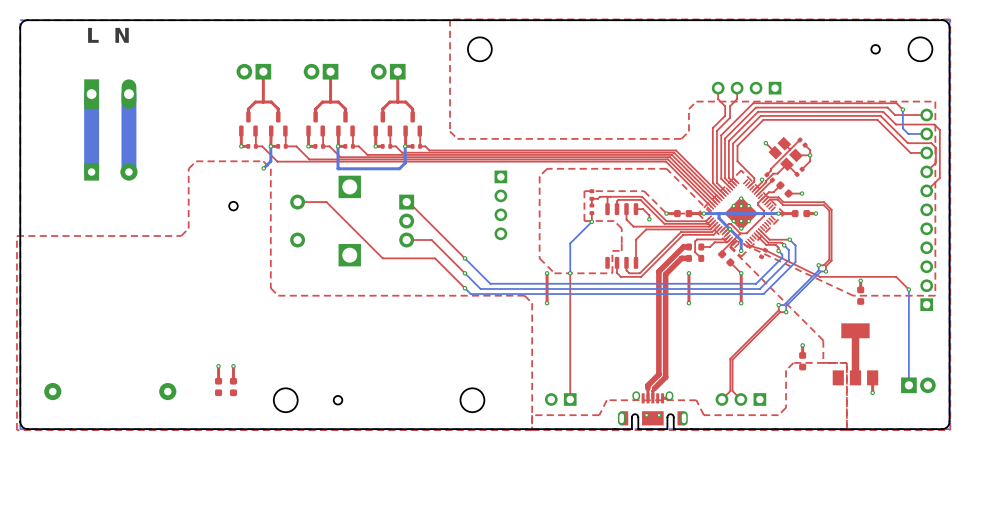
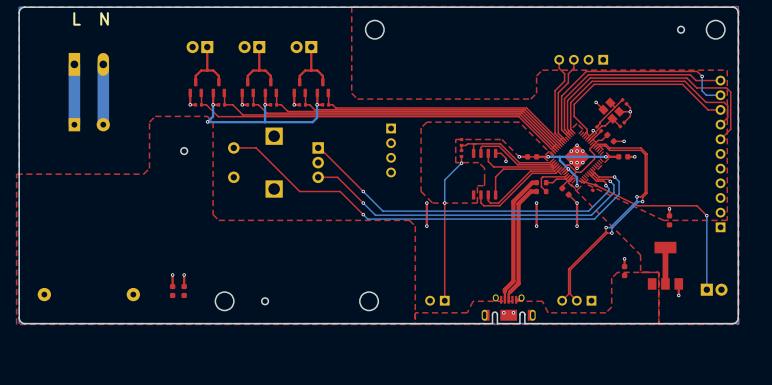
bottom track: none -> (207, 121) (265, 122)

